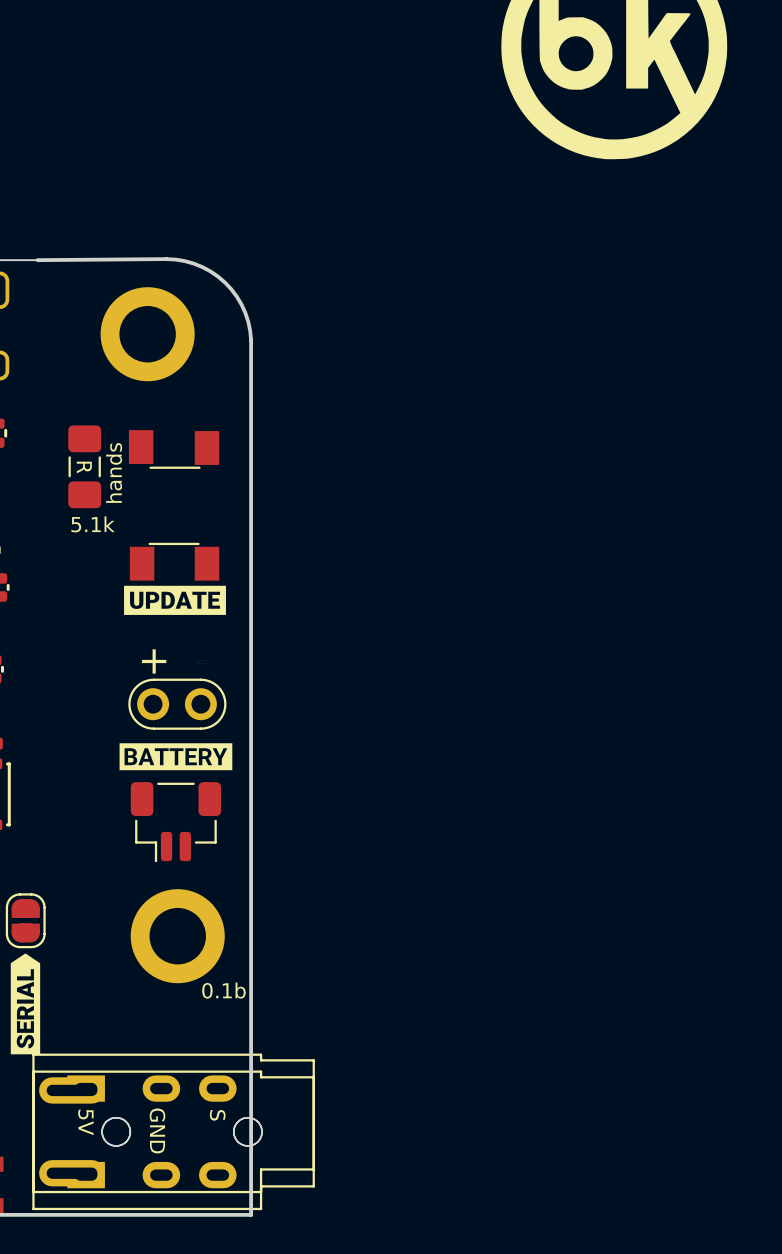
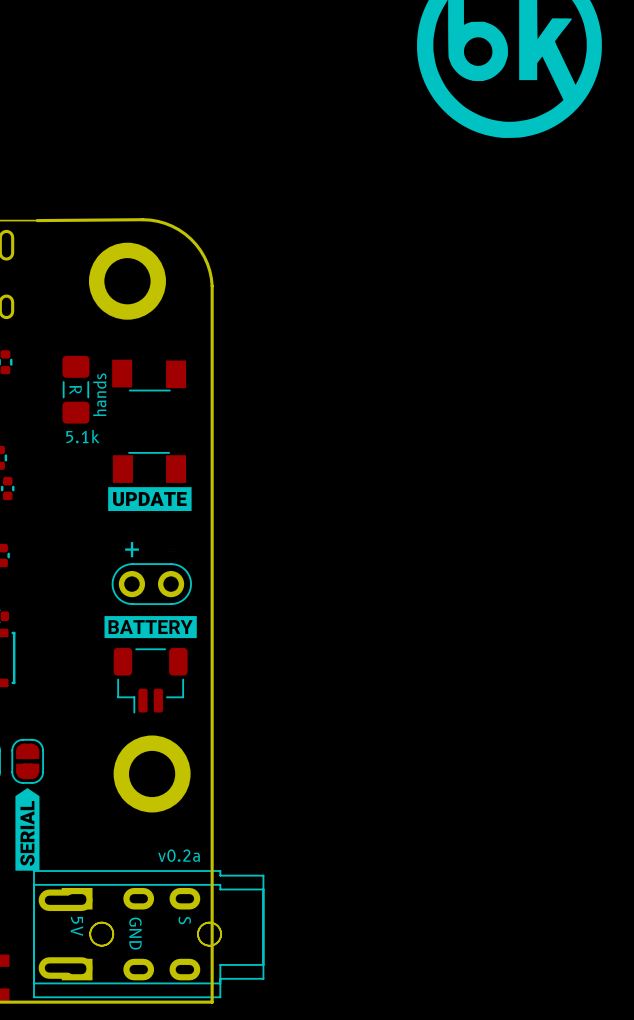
text: 0.1b (223, 990) -> none
text: none -> v0.2a (179, 855)

